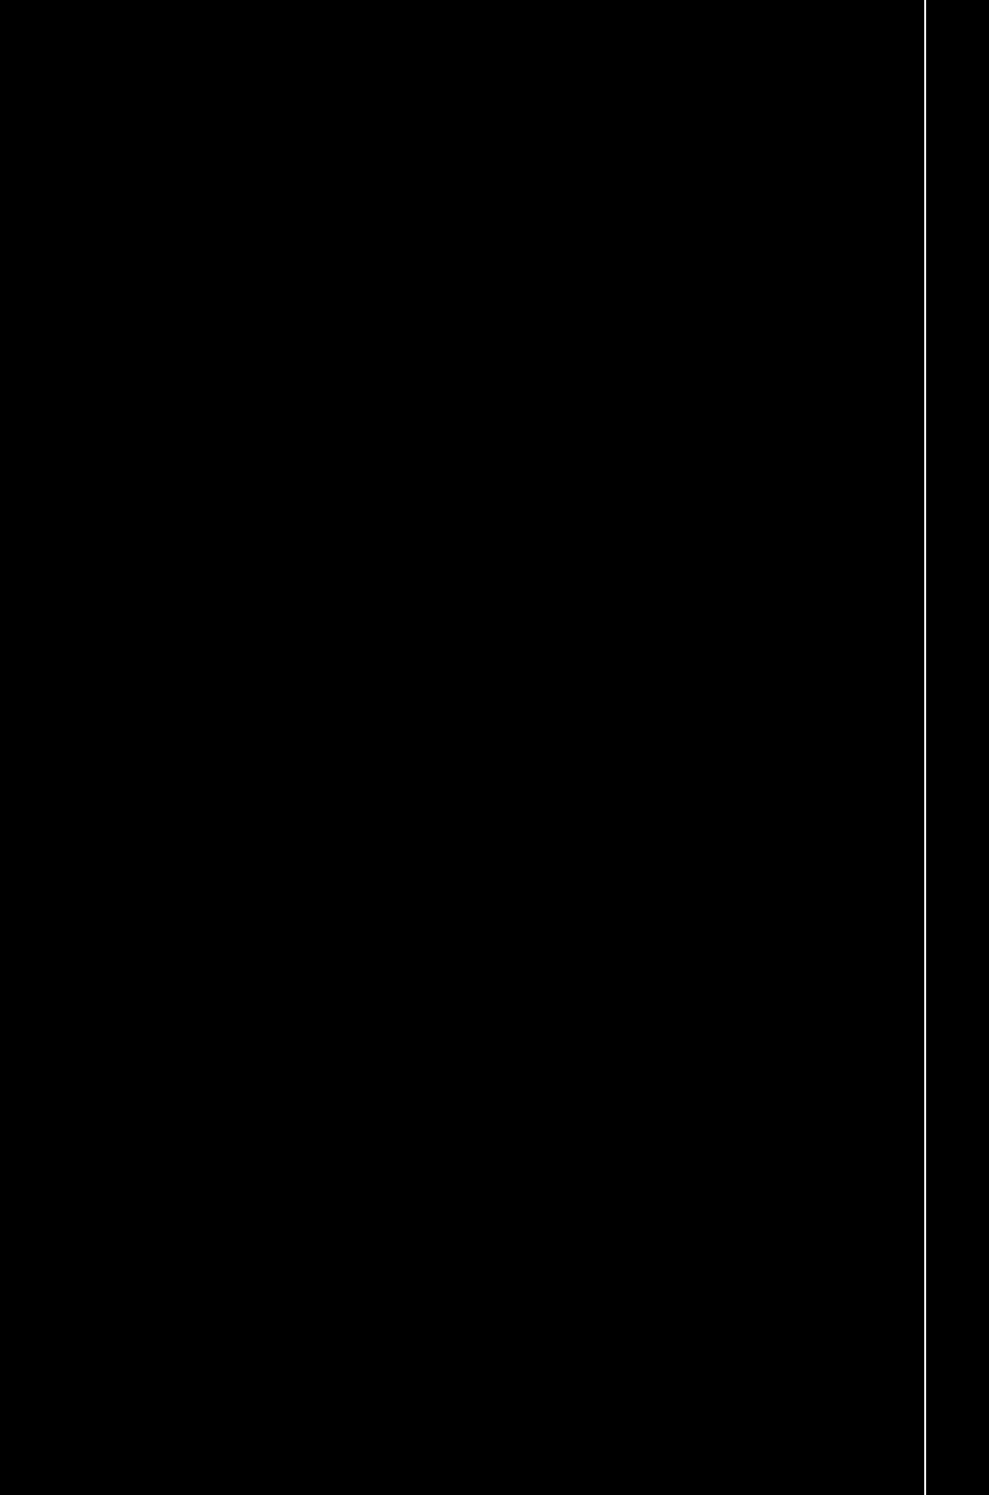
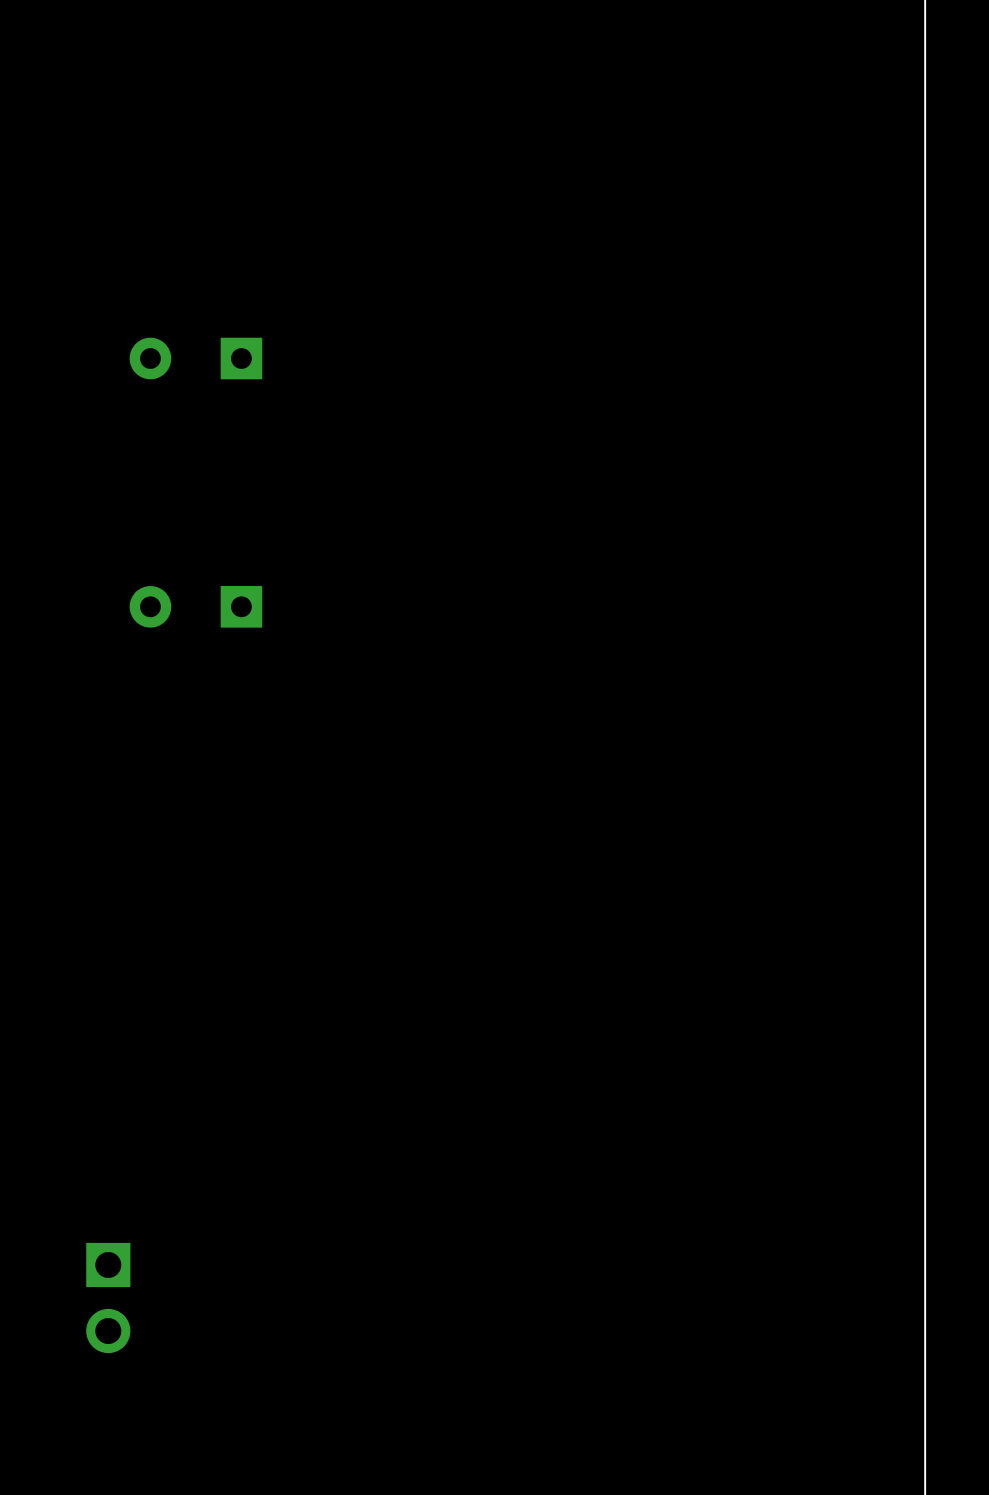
part: none -> (195, 358)
part: none -> (195, 606)
part: none -> (108, 1297)

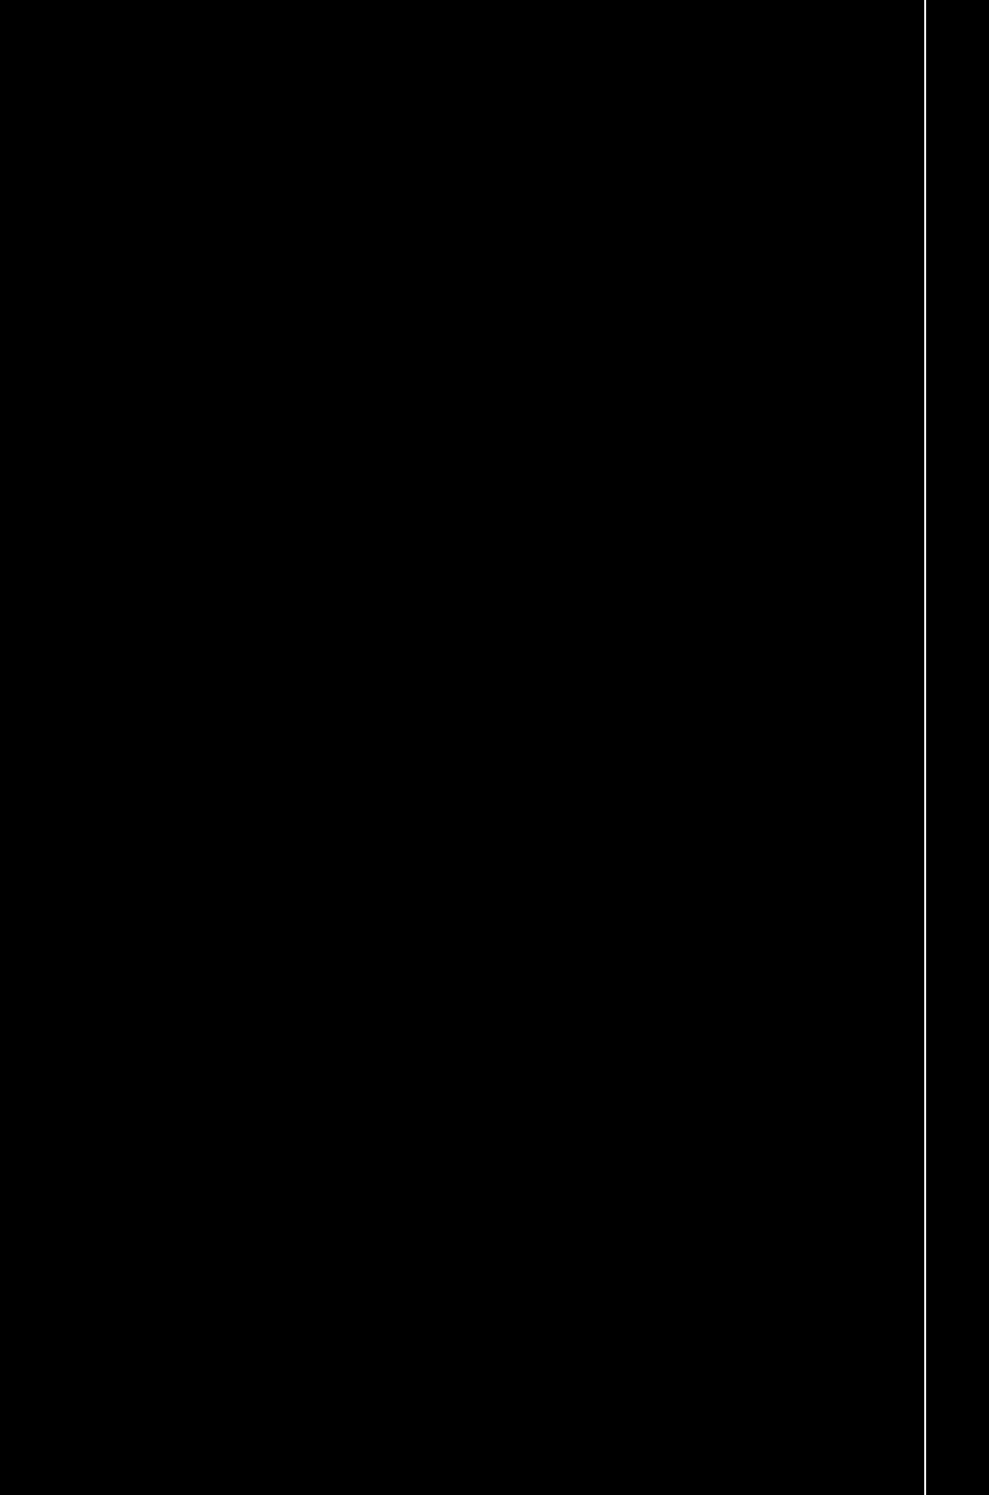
part: (195, 358) -> none
part: (195, 606) -> none
part: (108, 1297) -> none

